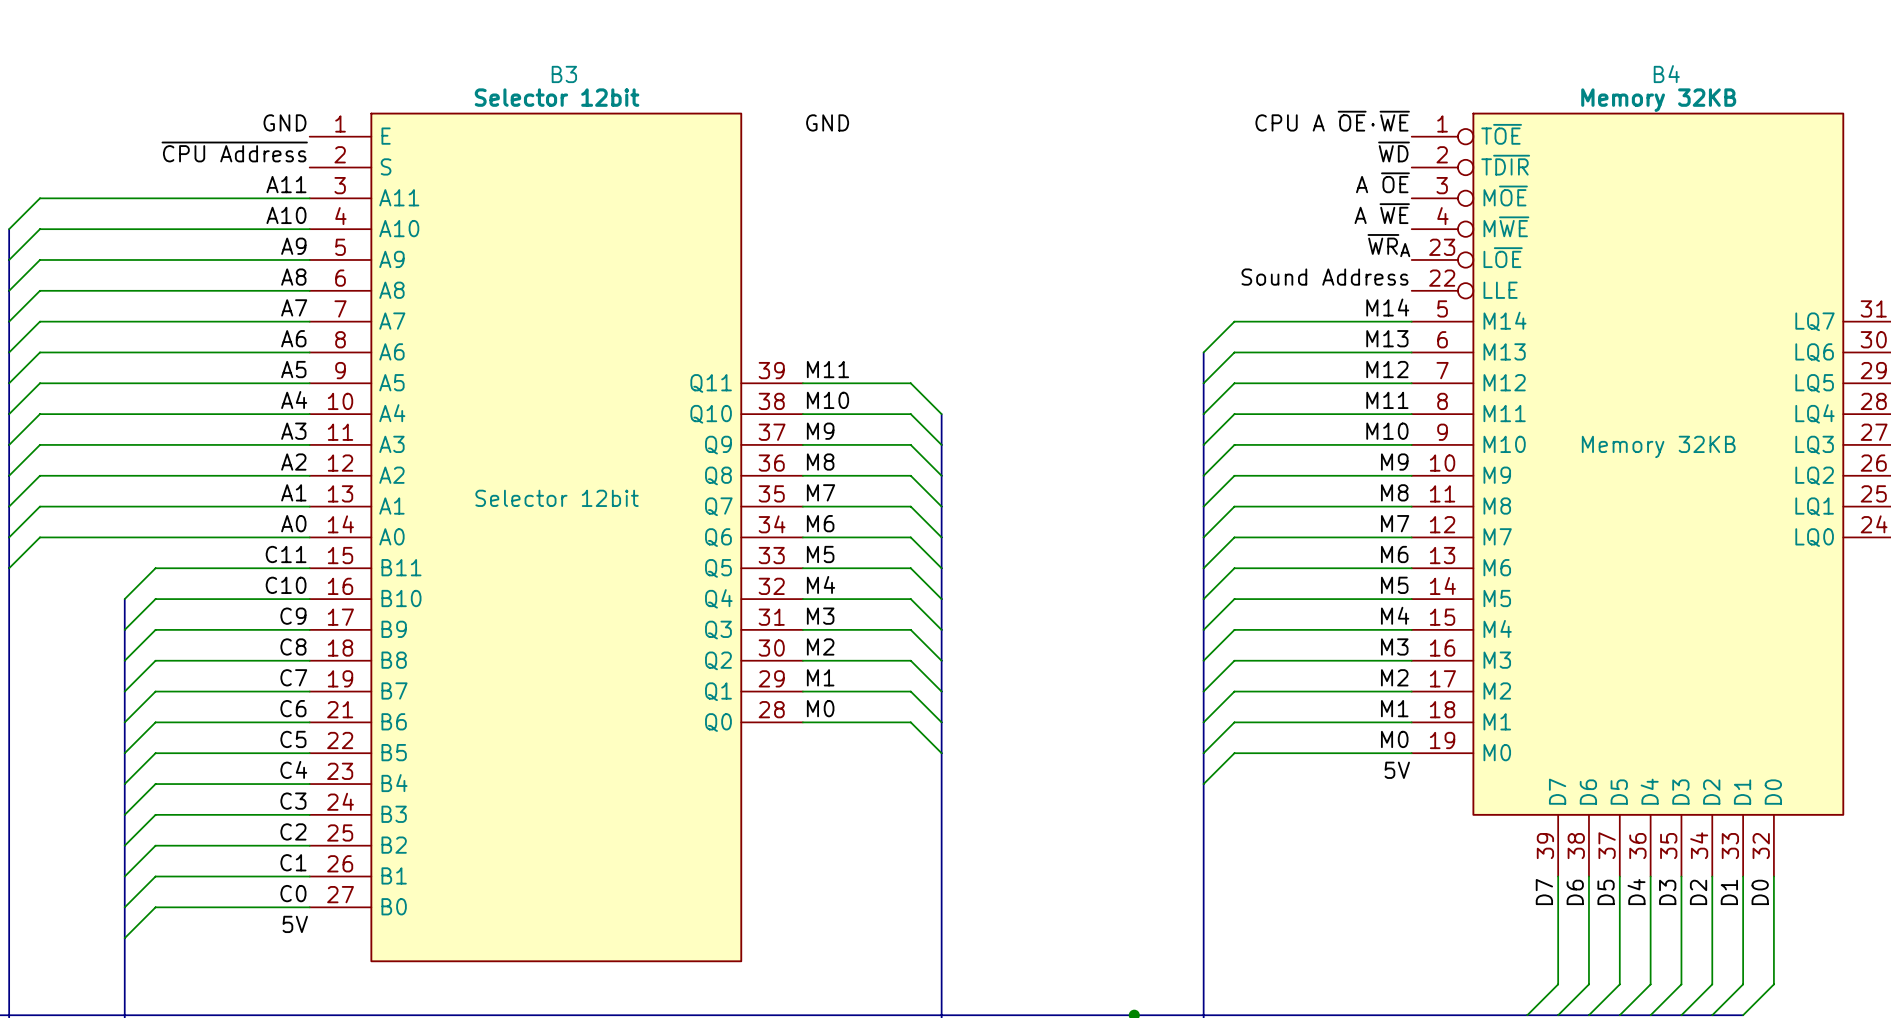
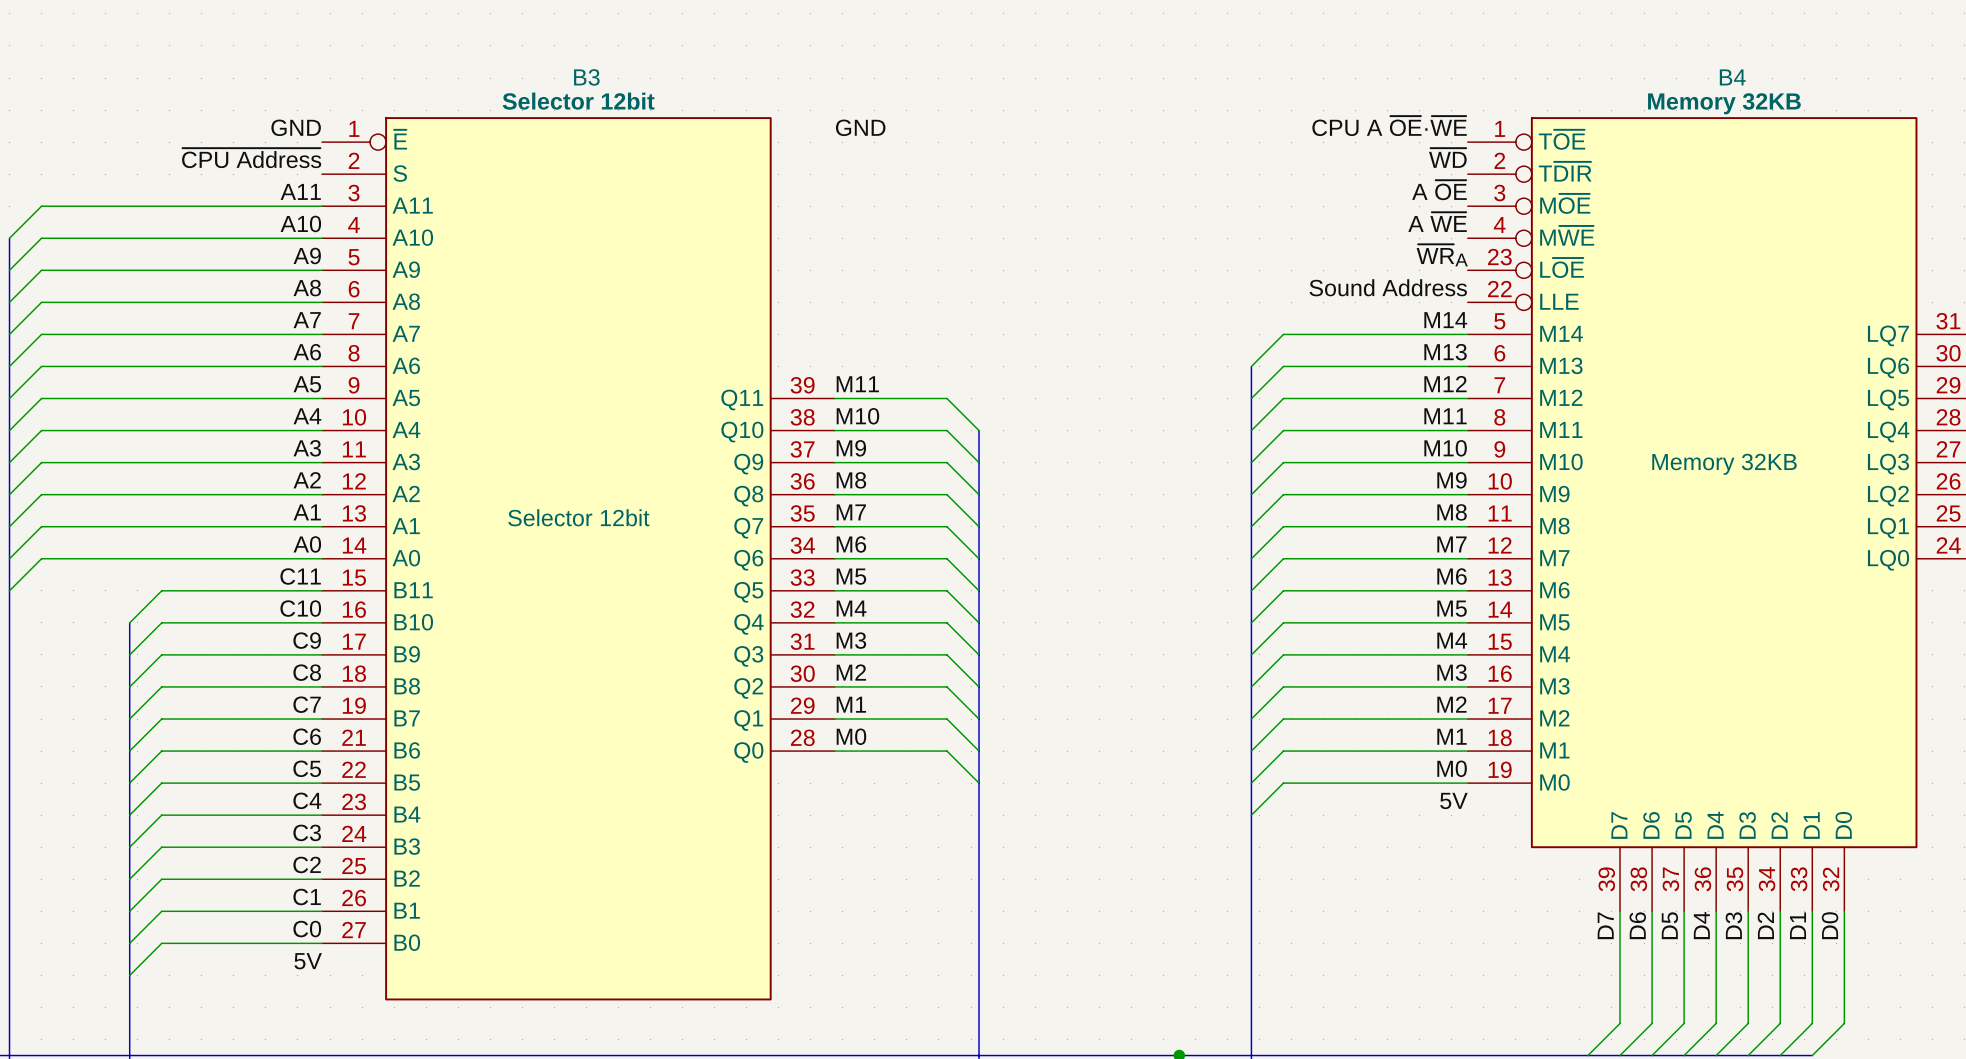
B3 symbol: [309, 112, 803, 963] -> [321, 117, 835, 1001]

